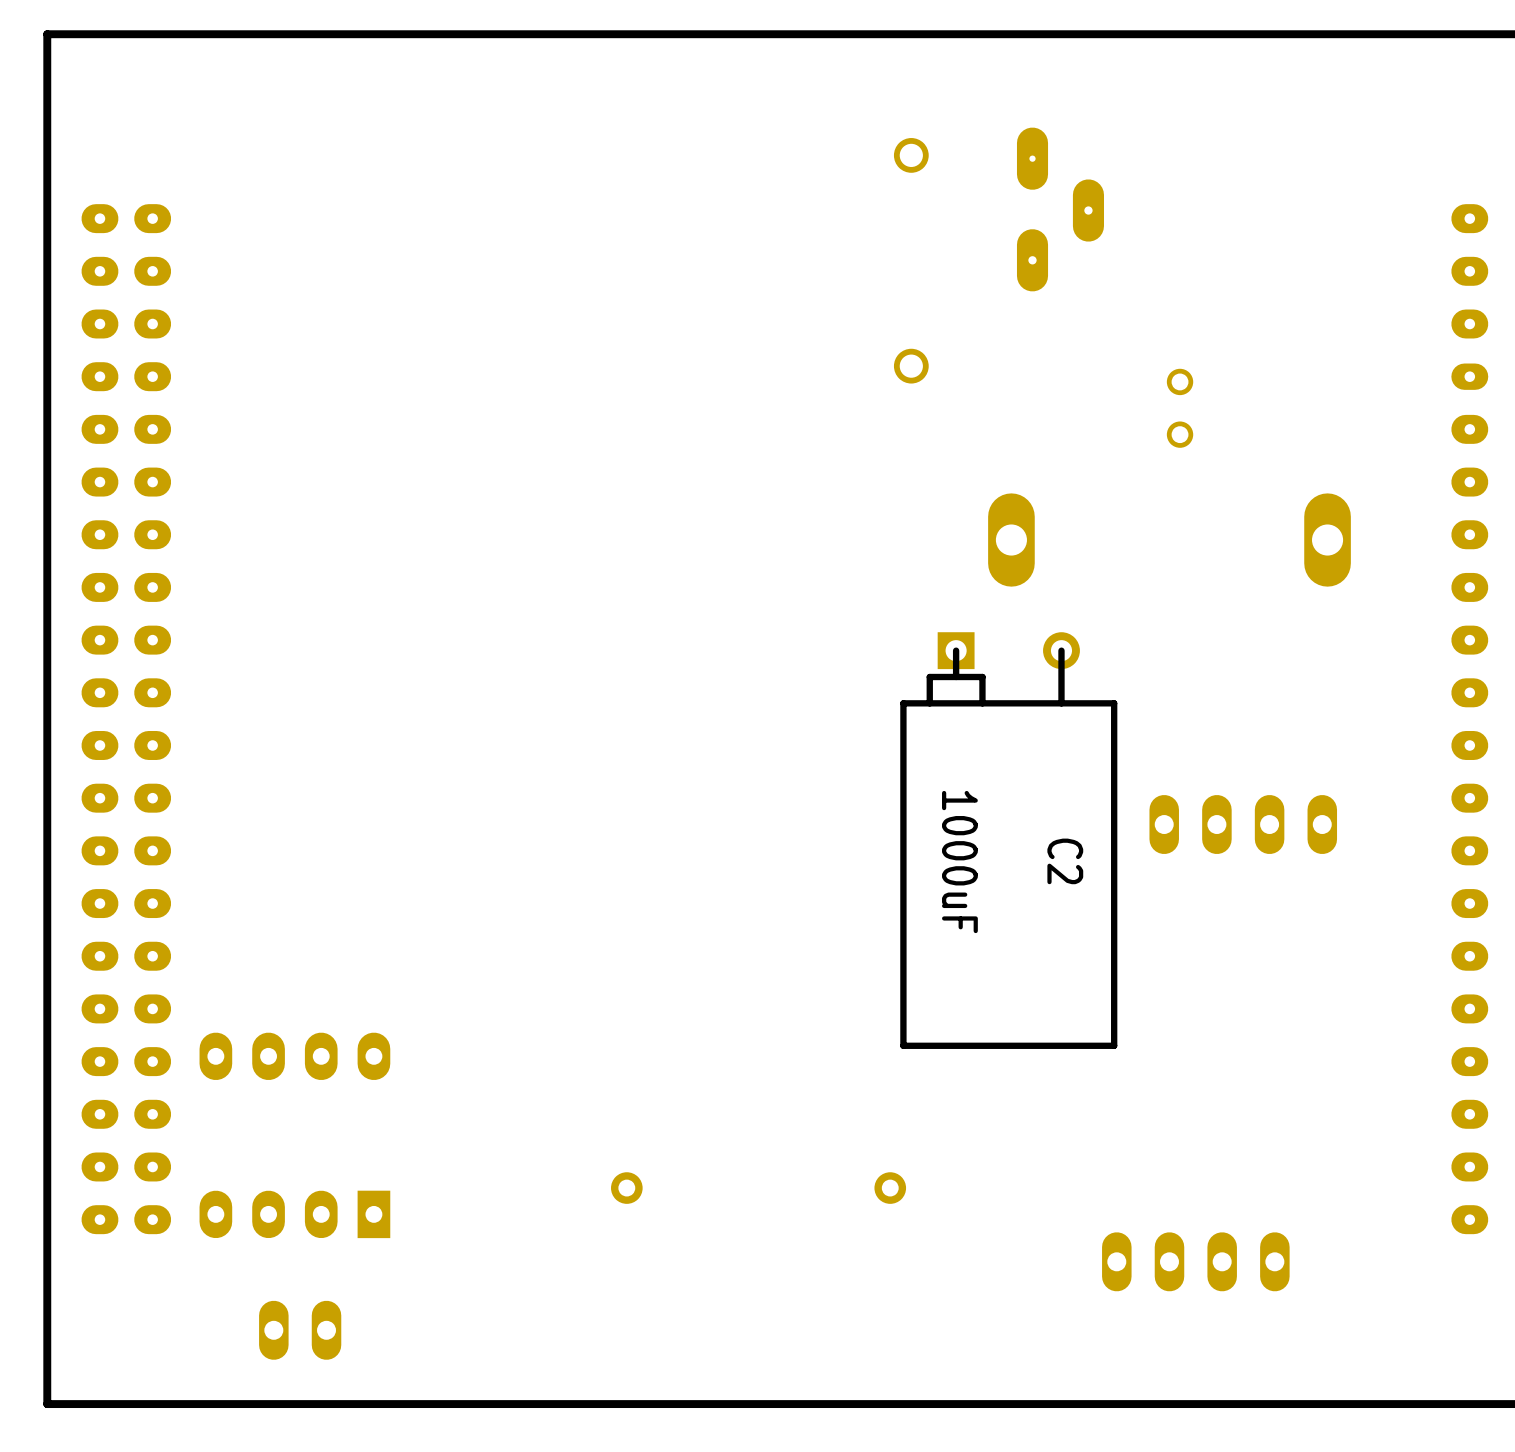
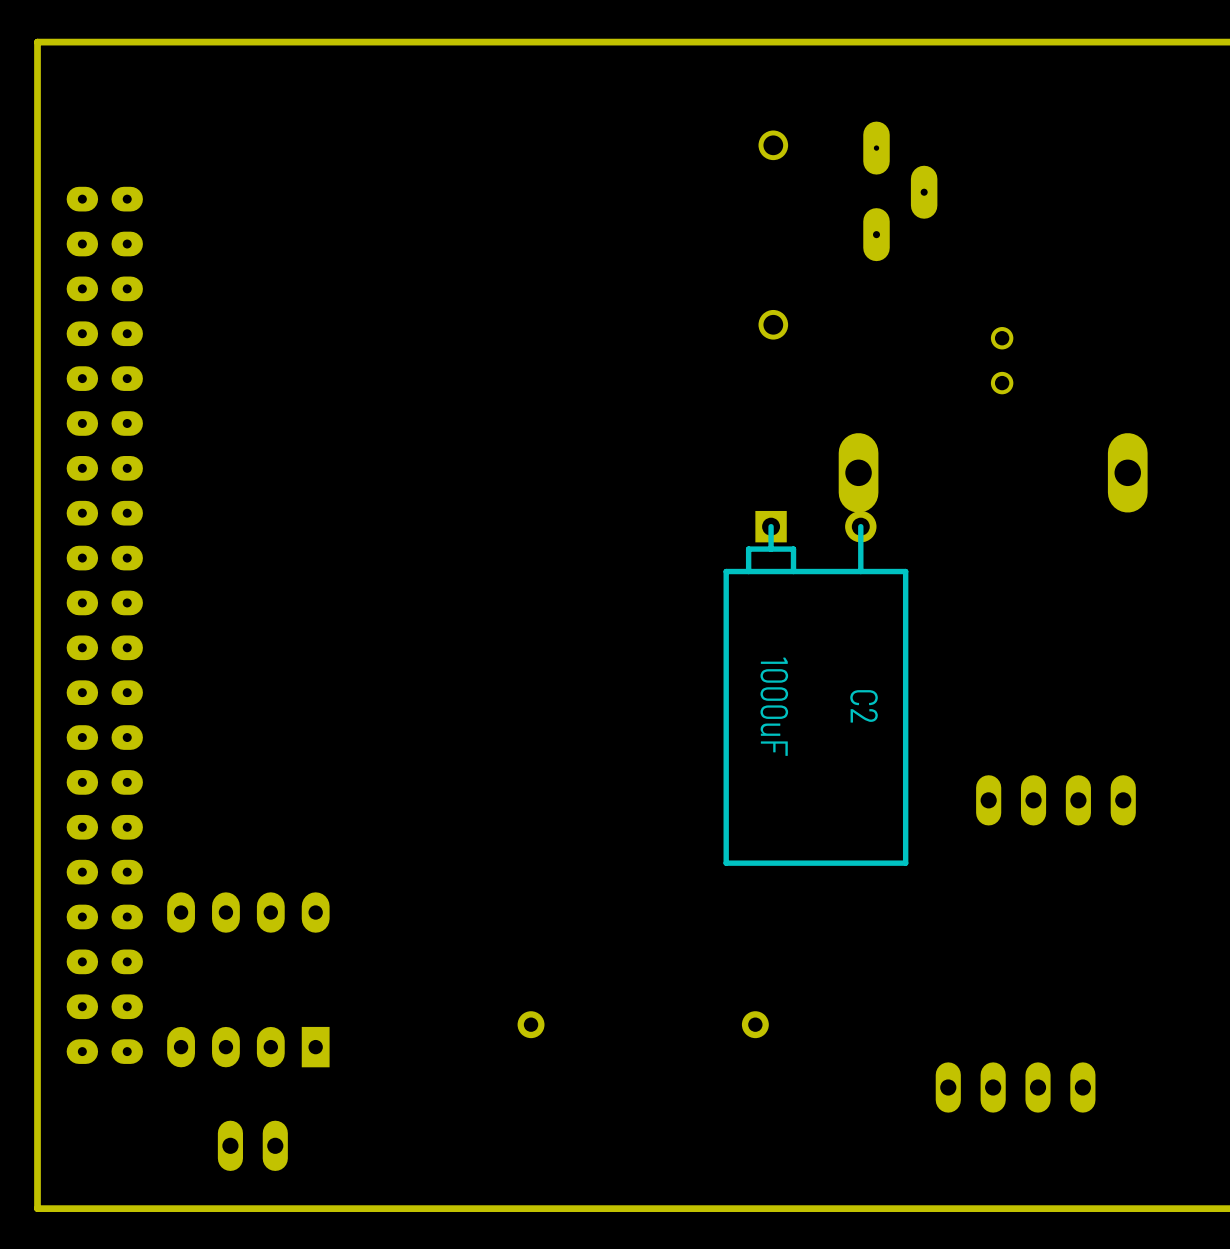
part position: (1243, 824) -> (1055, 800)
C2 position: (1008, 840) -> (815, 688)

